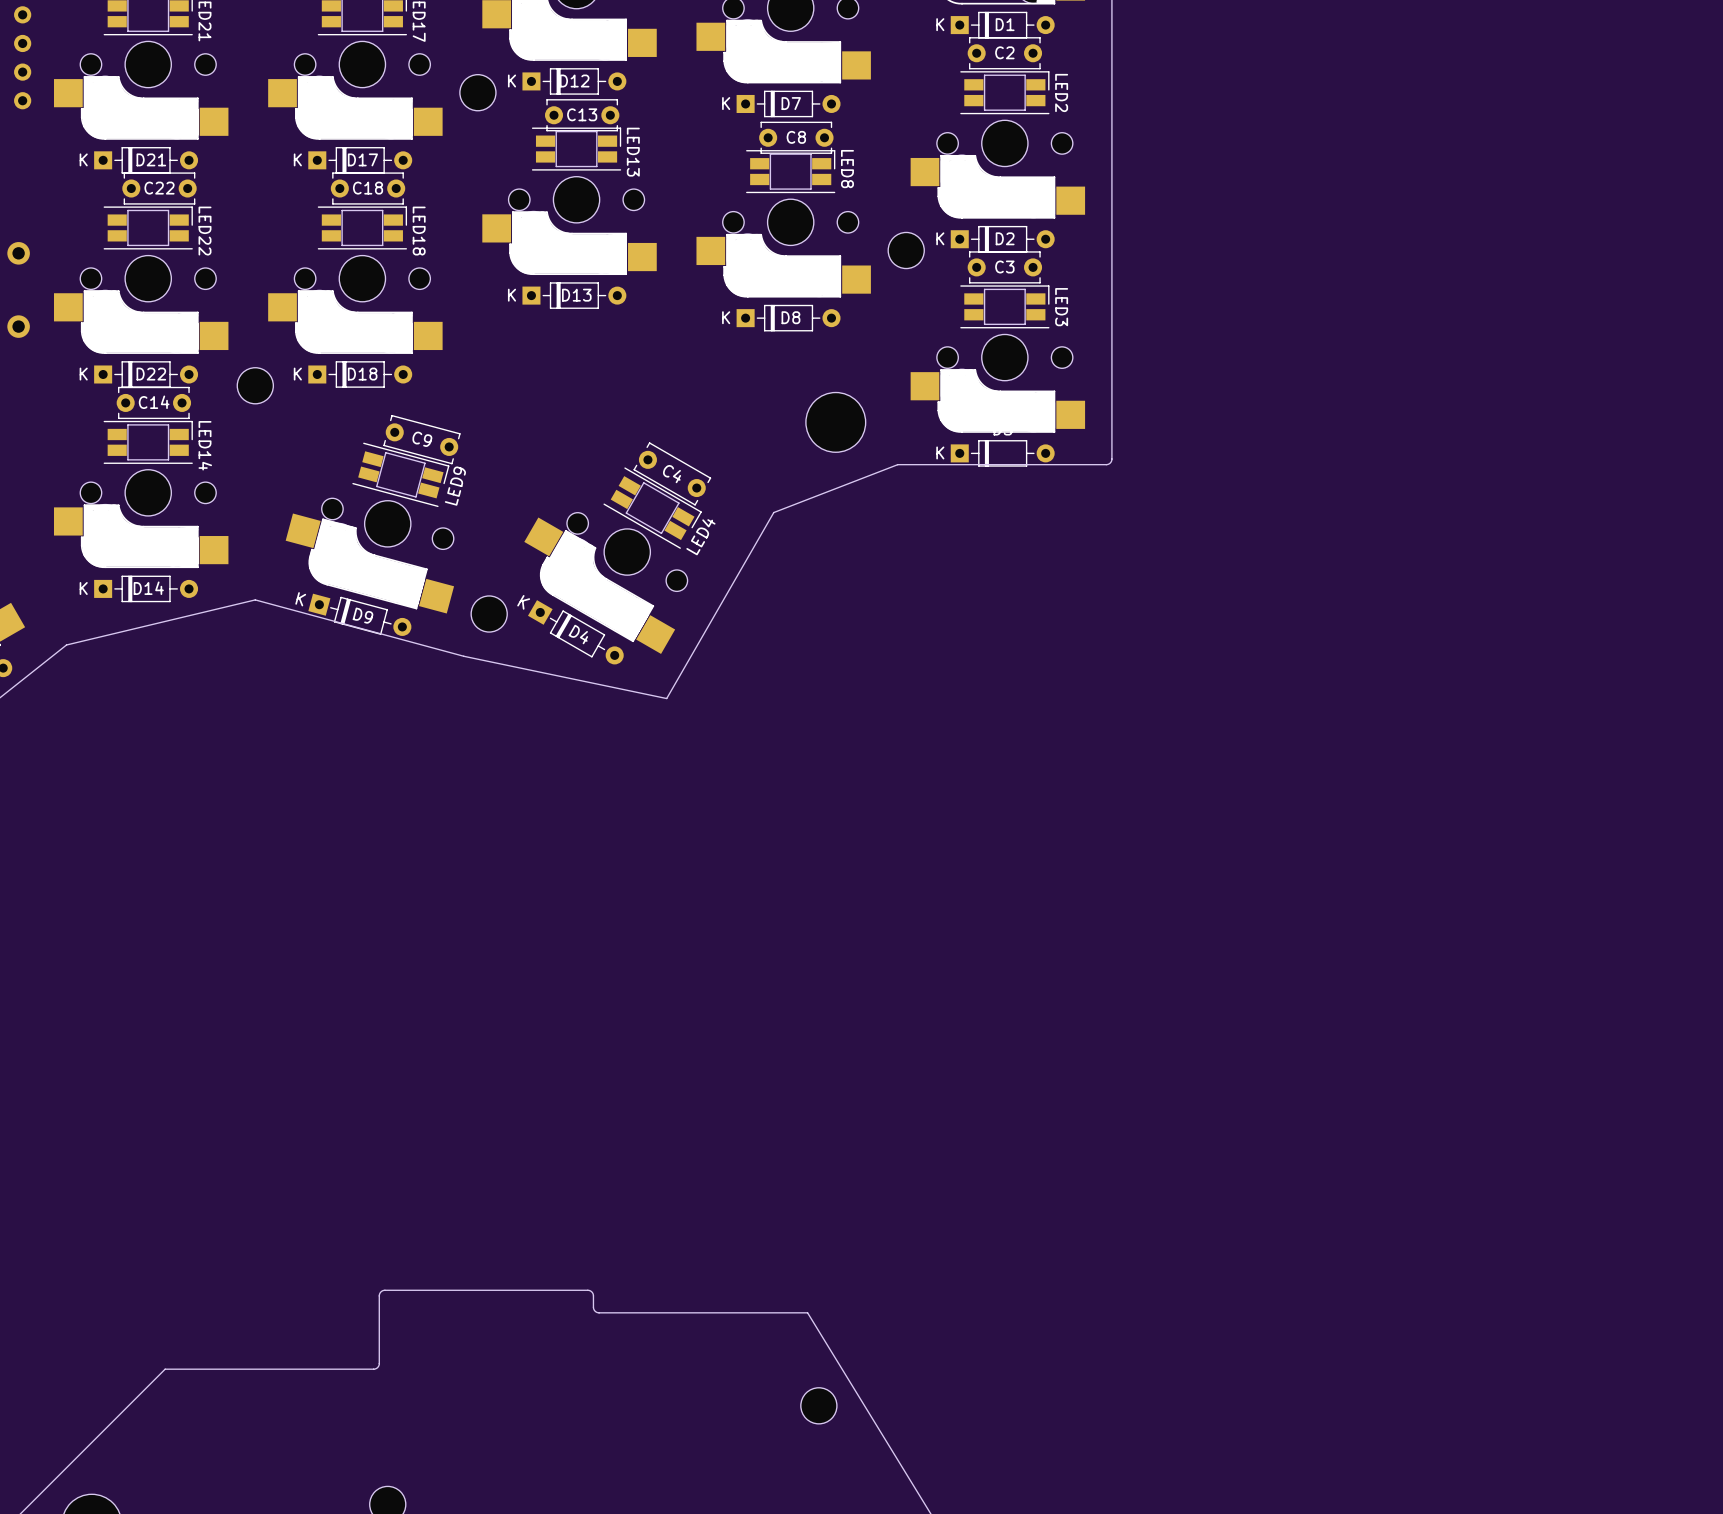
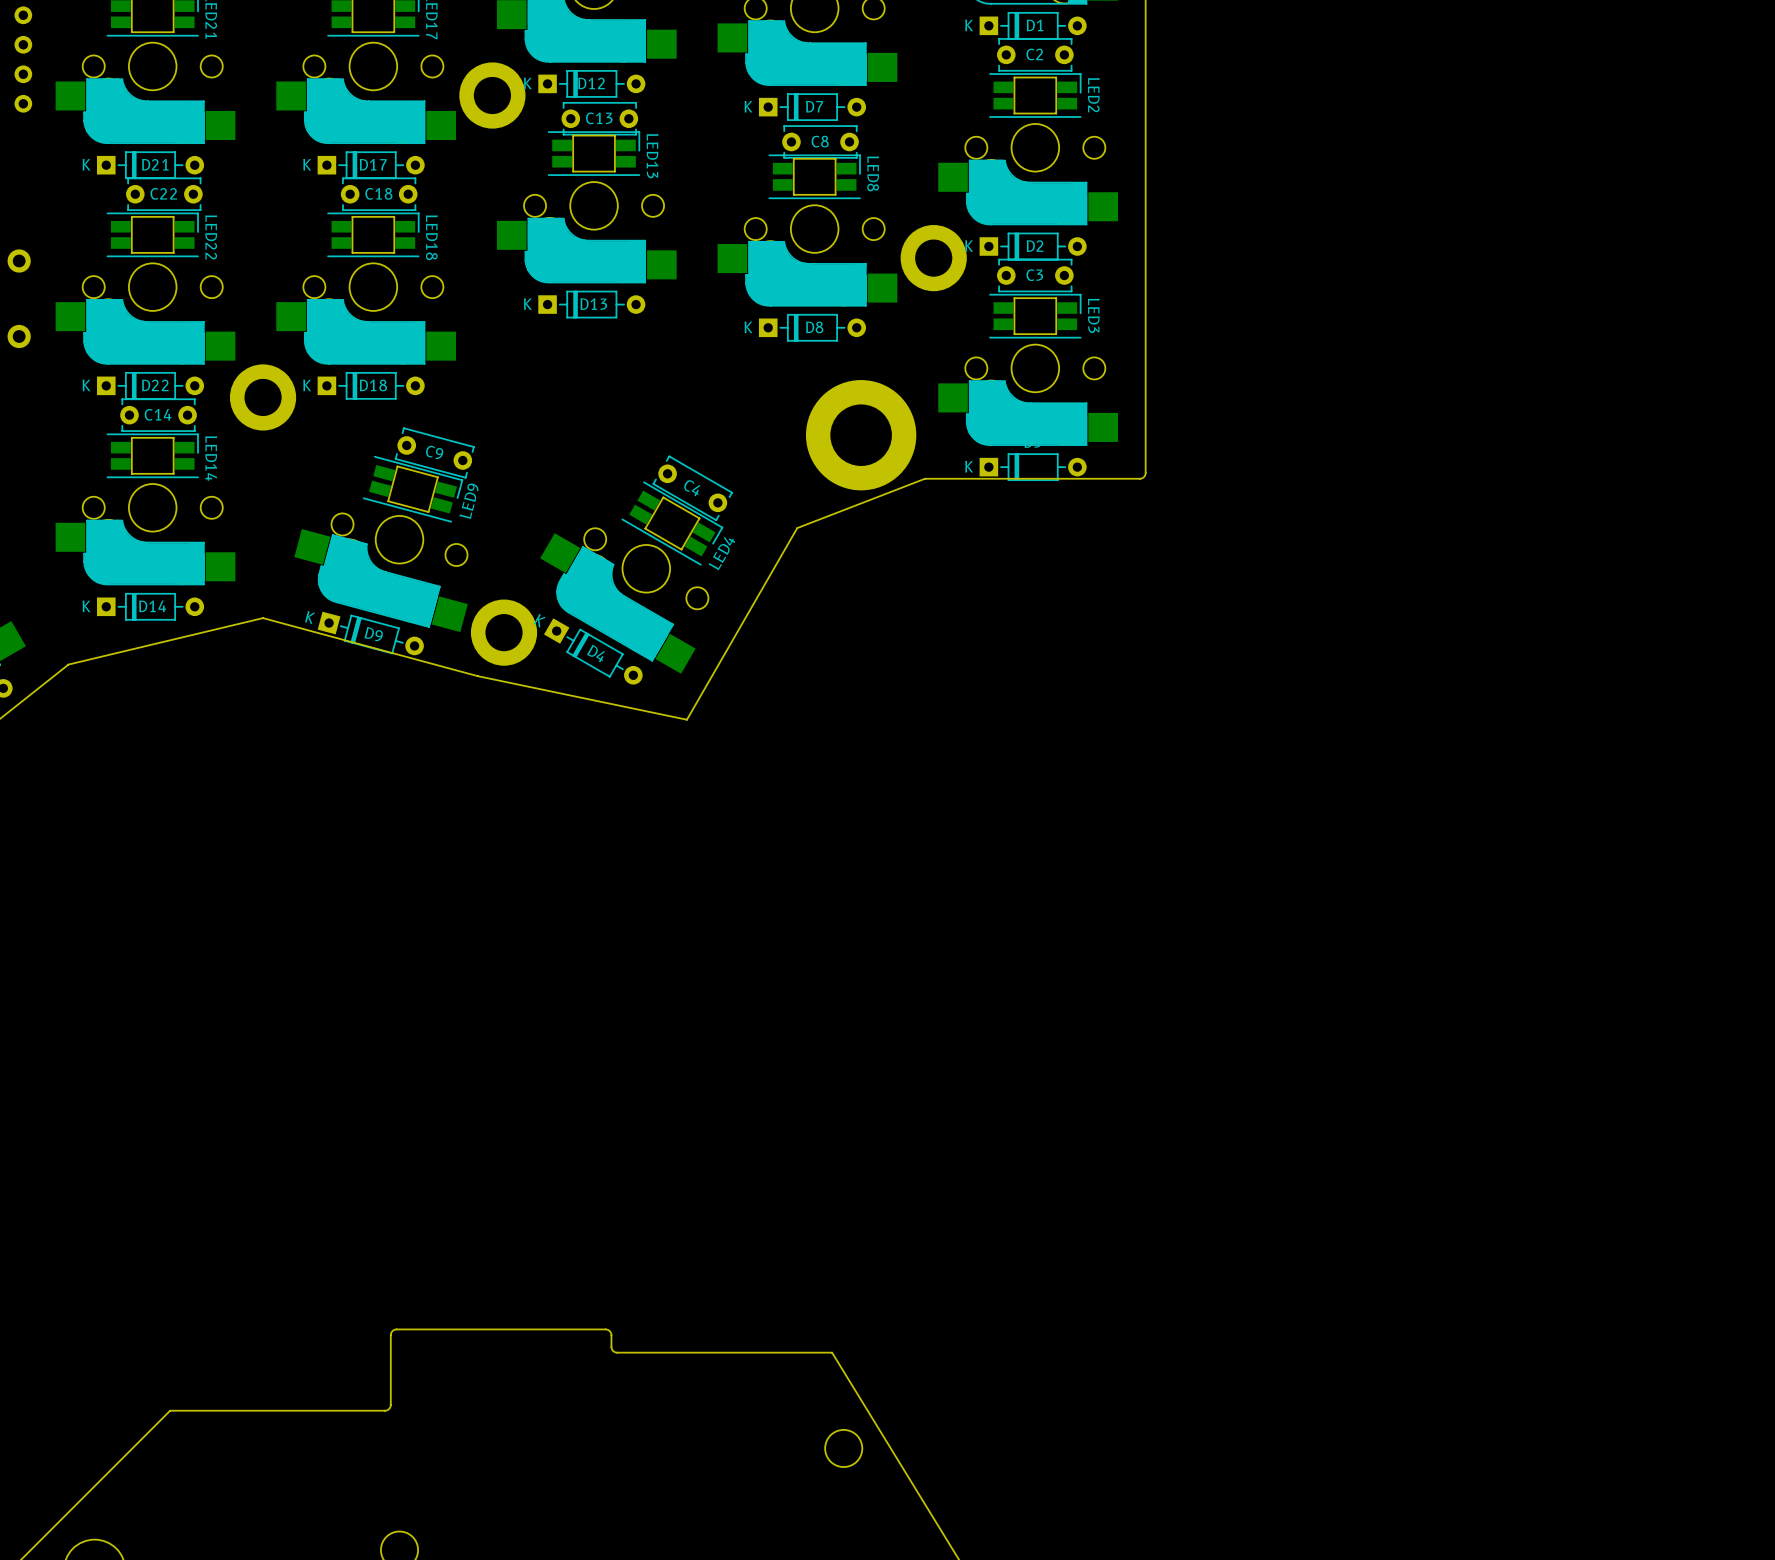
part footprint: [459, 74, 496, 111] -> [459, 62, 526, 129]
part footprint: [888, 232, 925, 269] -> [900, 225, 967, 292]
part footprint: [237, 367, 274, 404] -> [229, 364, 297, 431]
part footprint: [805, 392, 866, 453] -> [805, 380, 917, 491]
part footprint: [471, 595, 508, 633] -> [470, 599, 538, 666]

